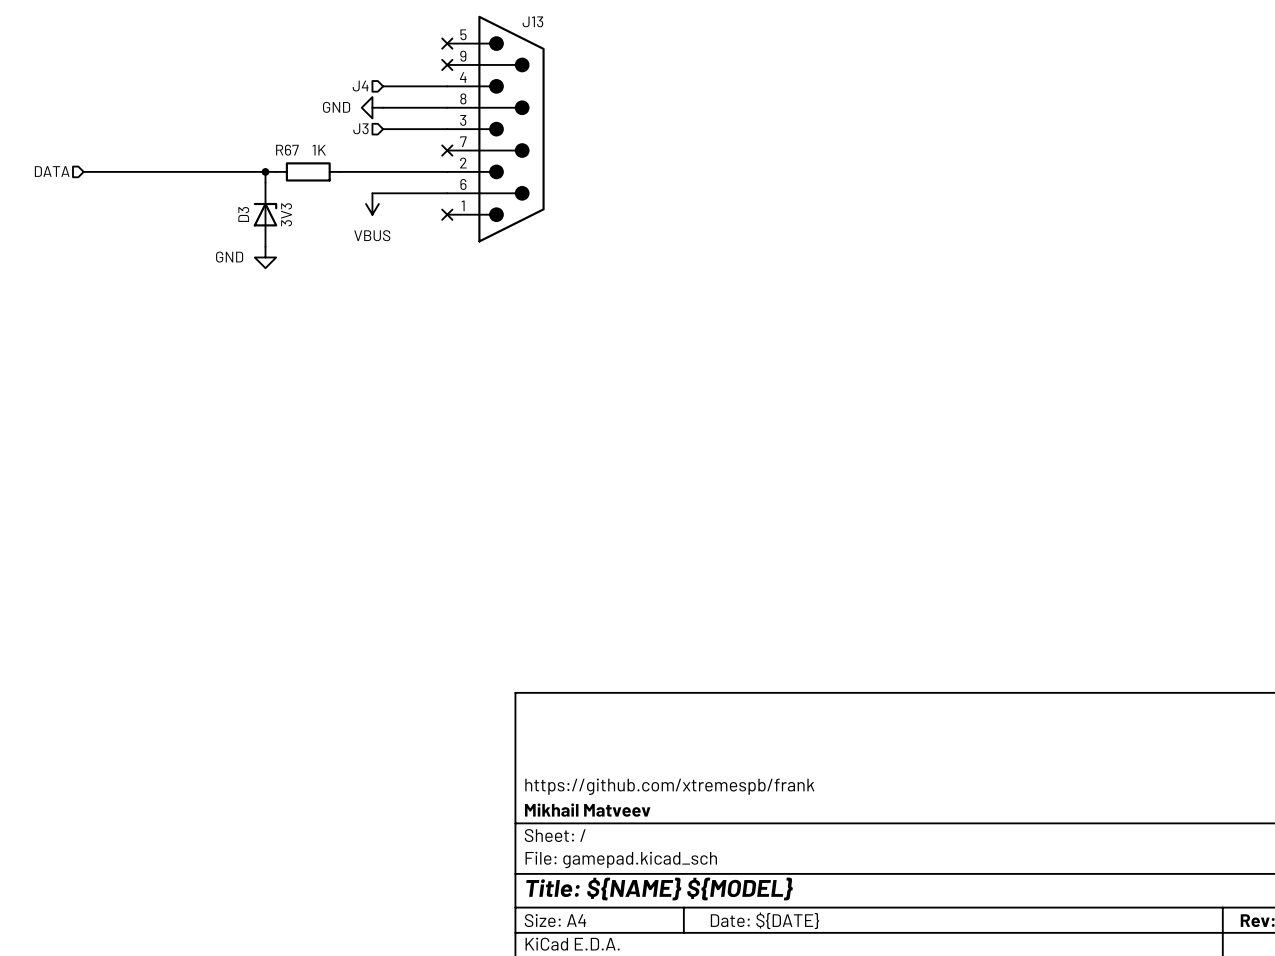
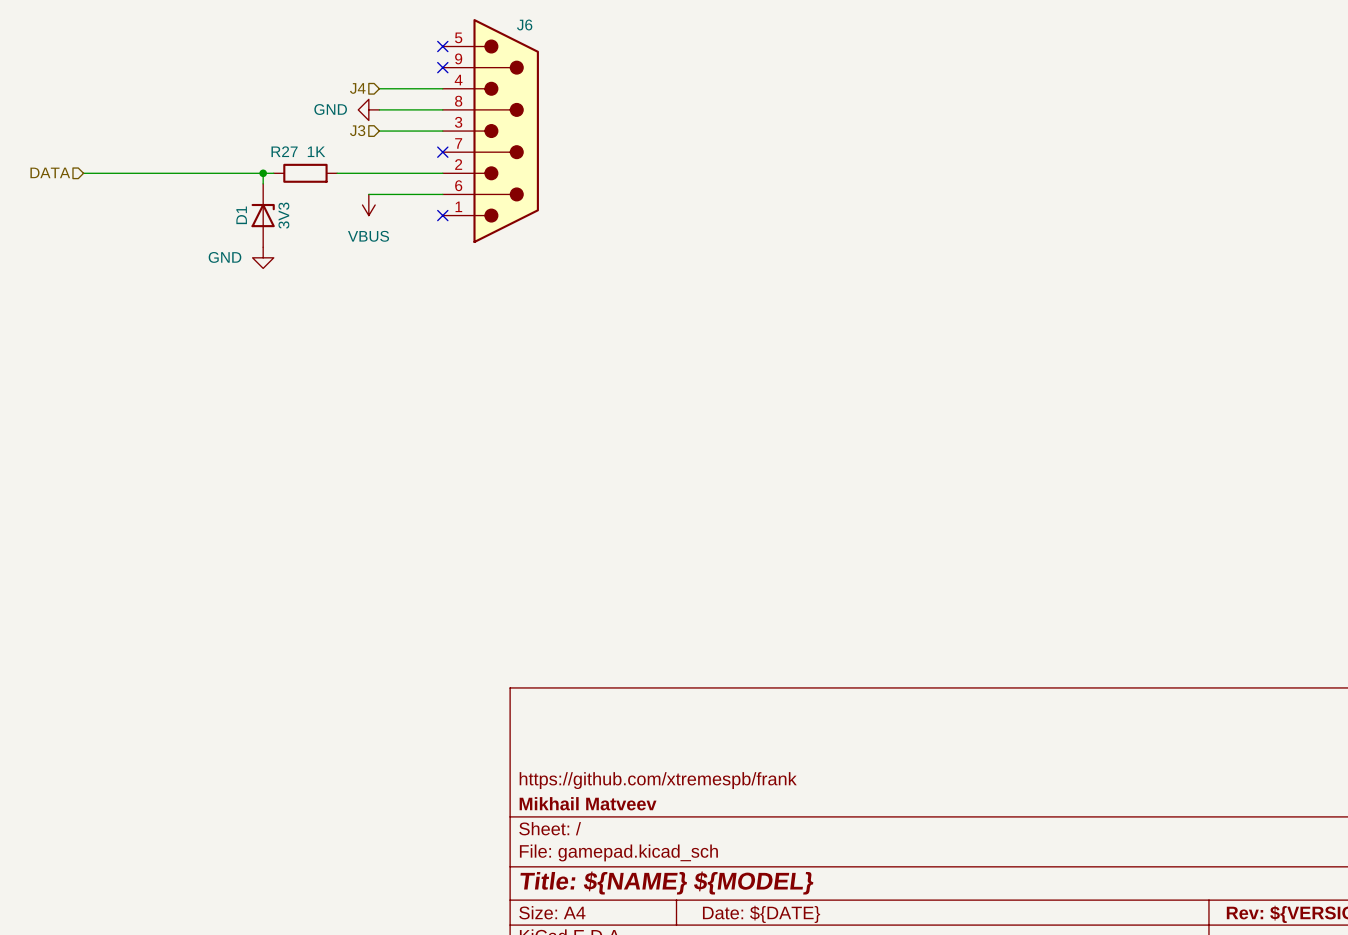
J13 name: J13 (532, 21) -> J6 (524, 24)
R67 name: R67 (287, 150) -> R27 (284, 151)
D3 name: D3 (243, 214) -> D1 (241, 215)

